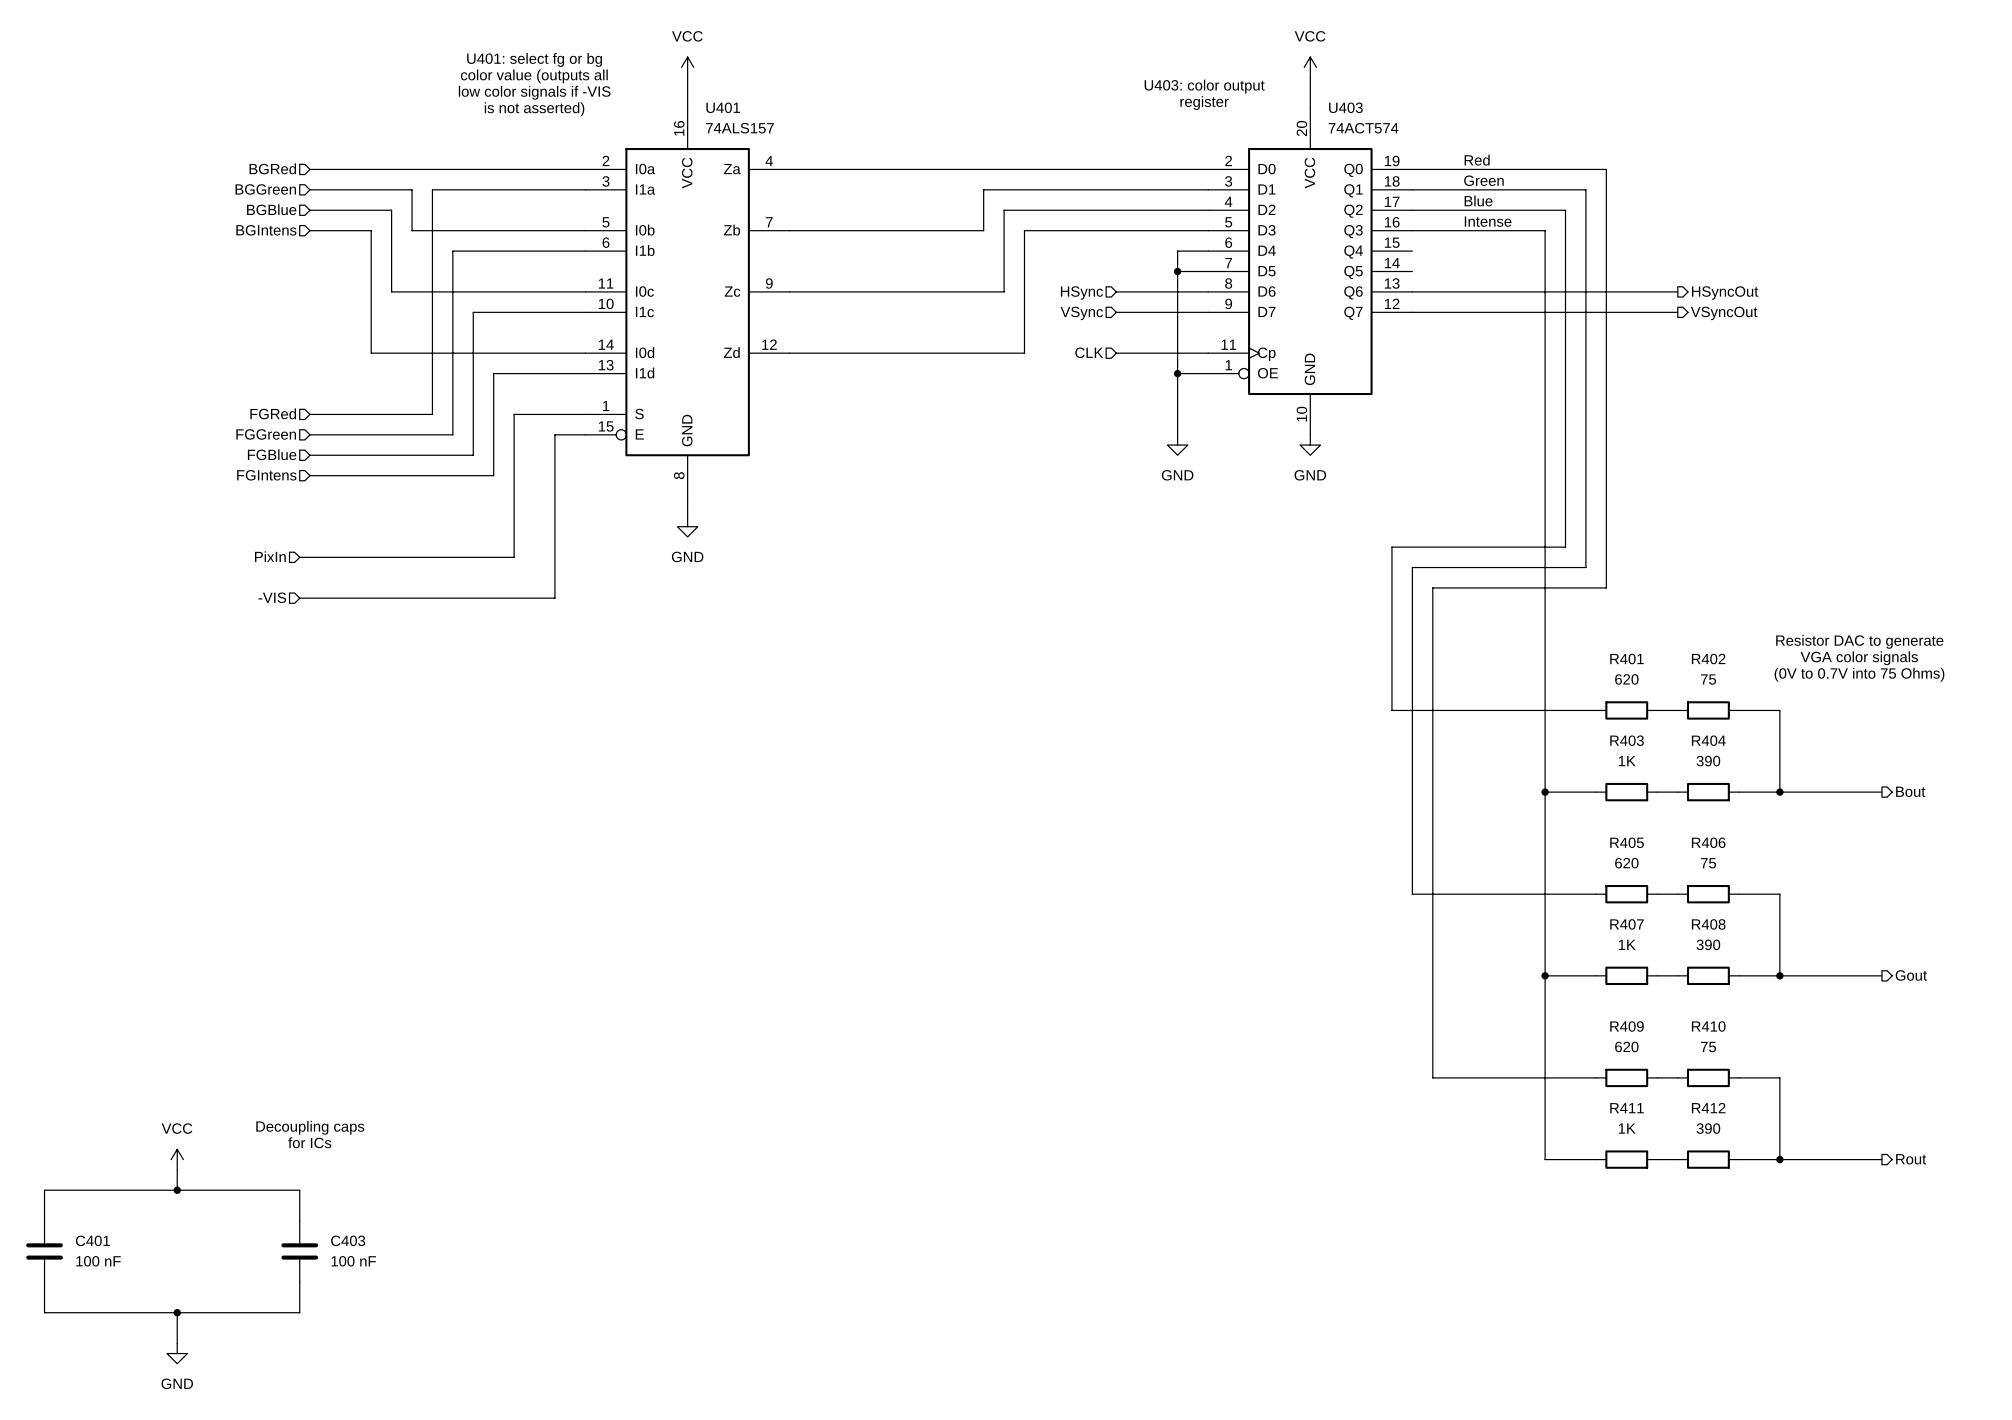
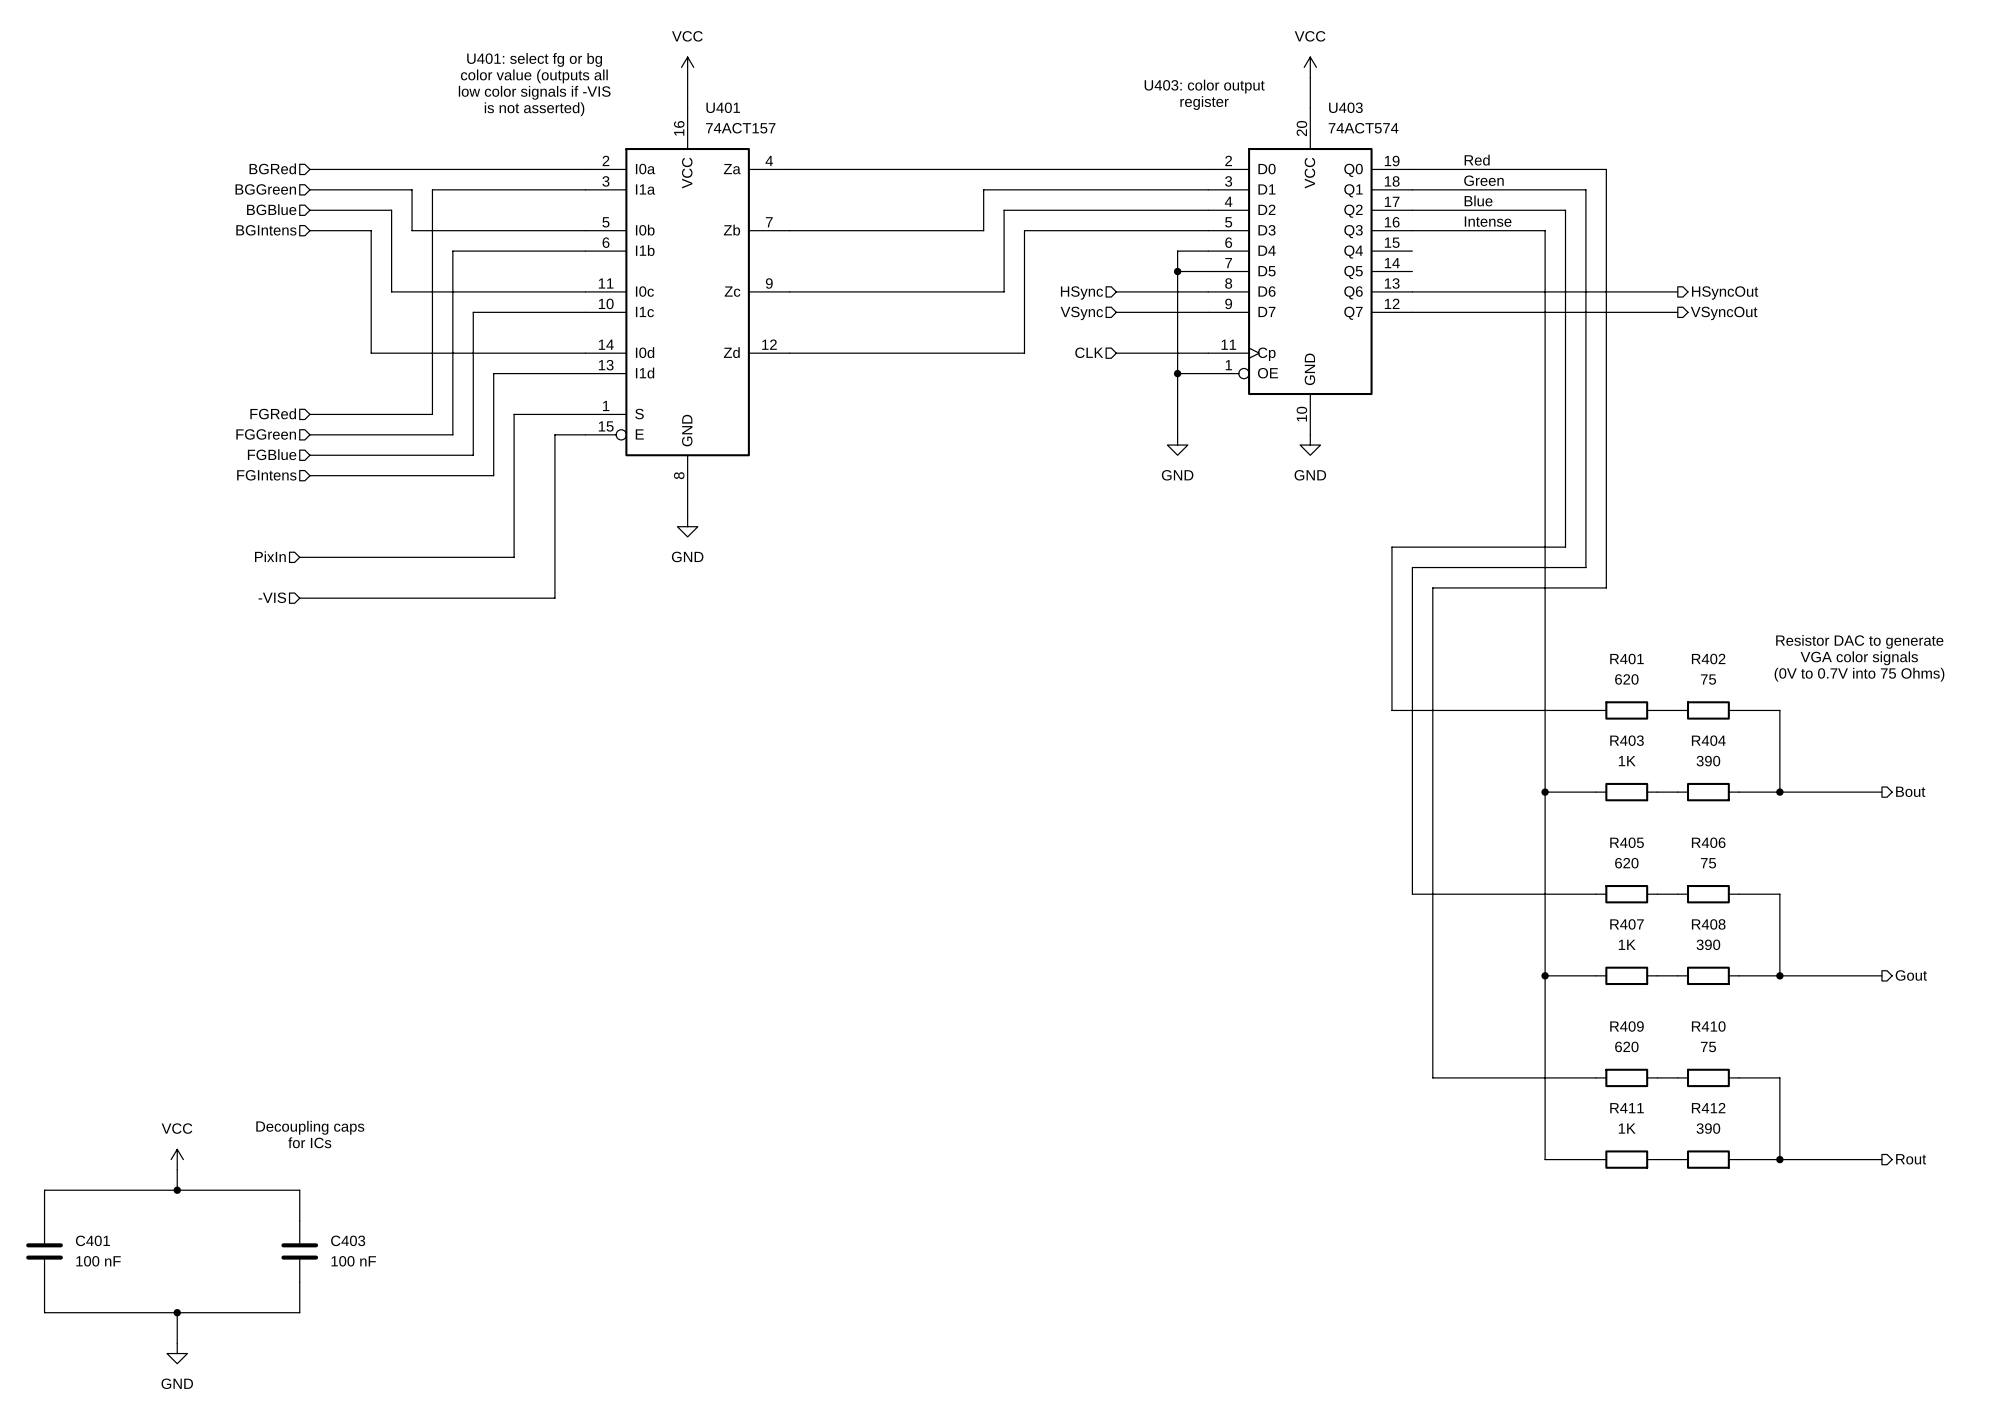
U401 value: 74ALS157 (739, 128) -> 74ACT157 (740, 128)

